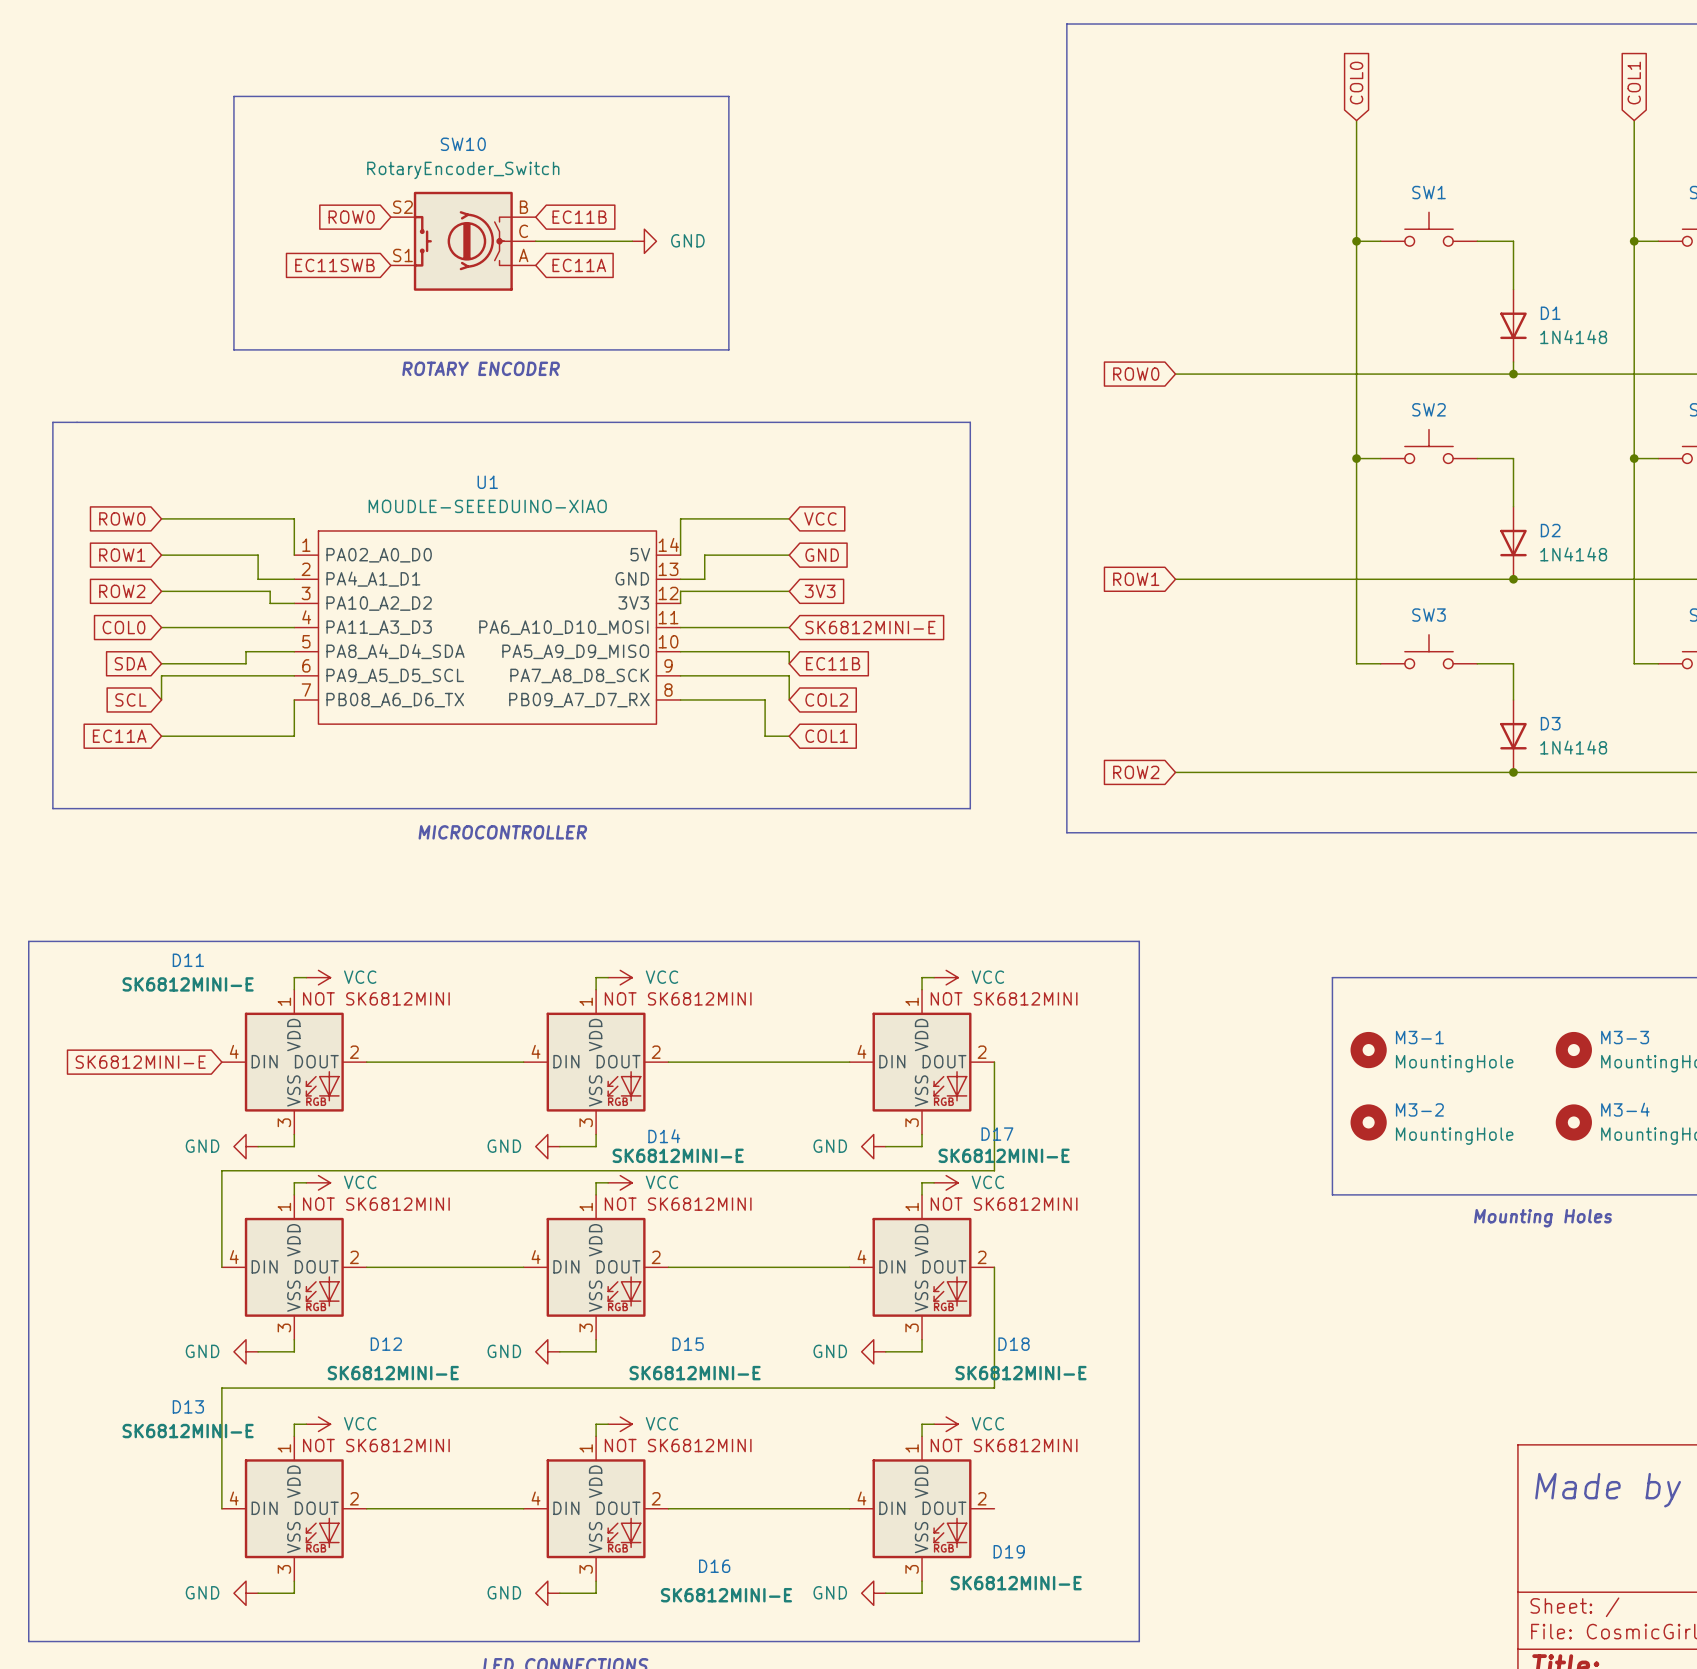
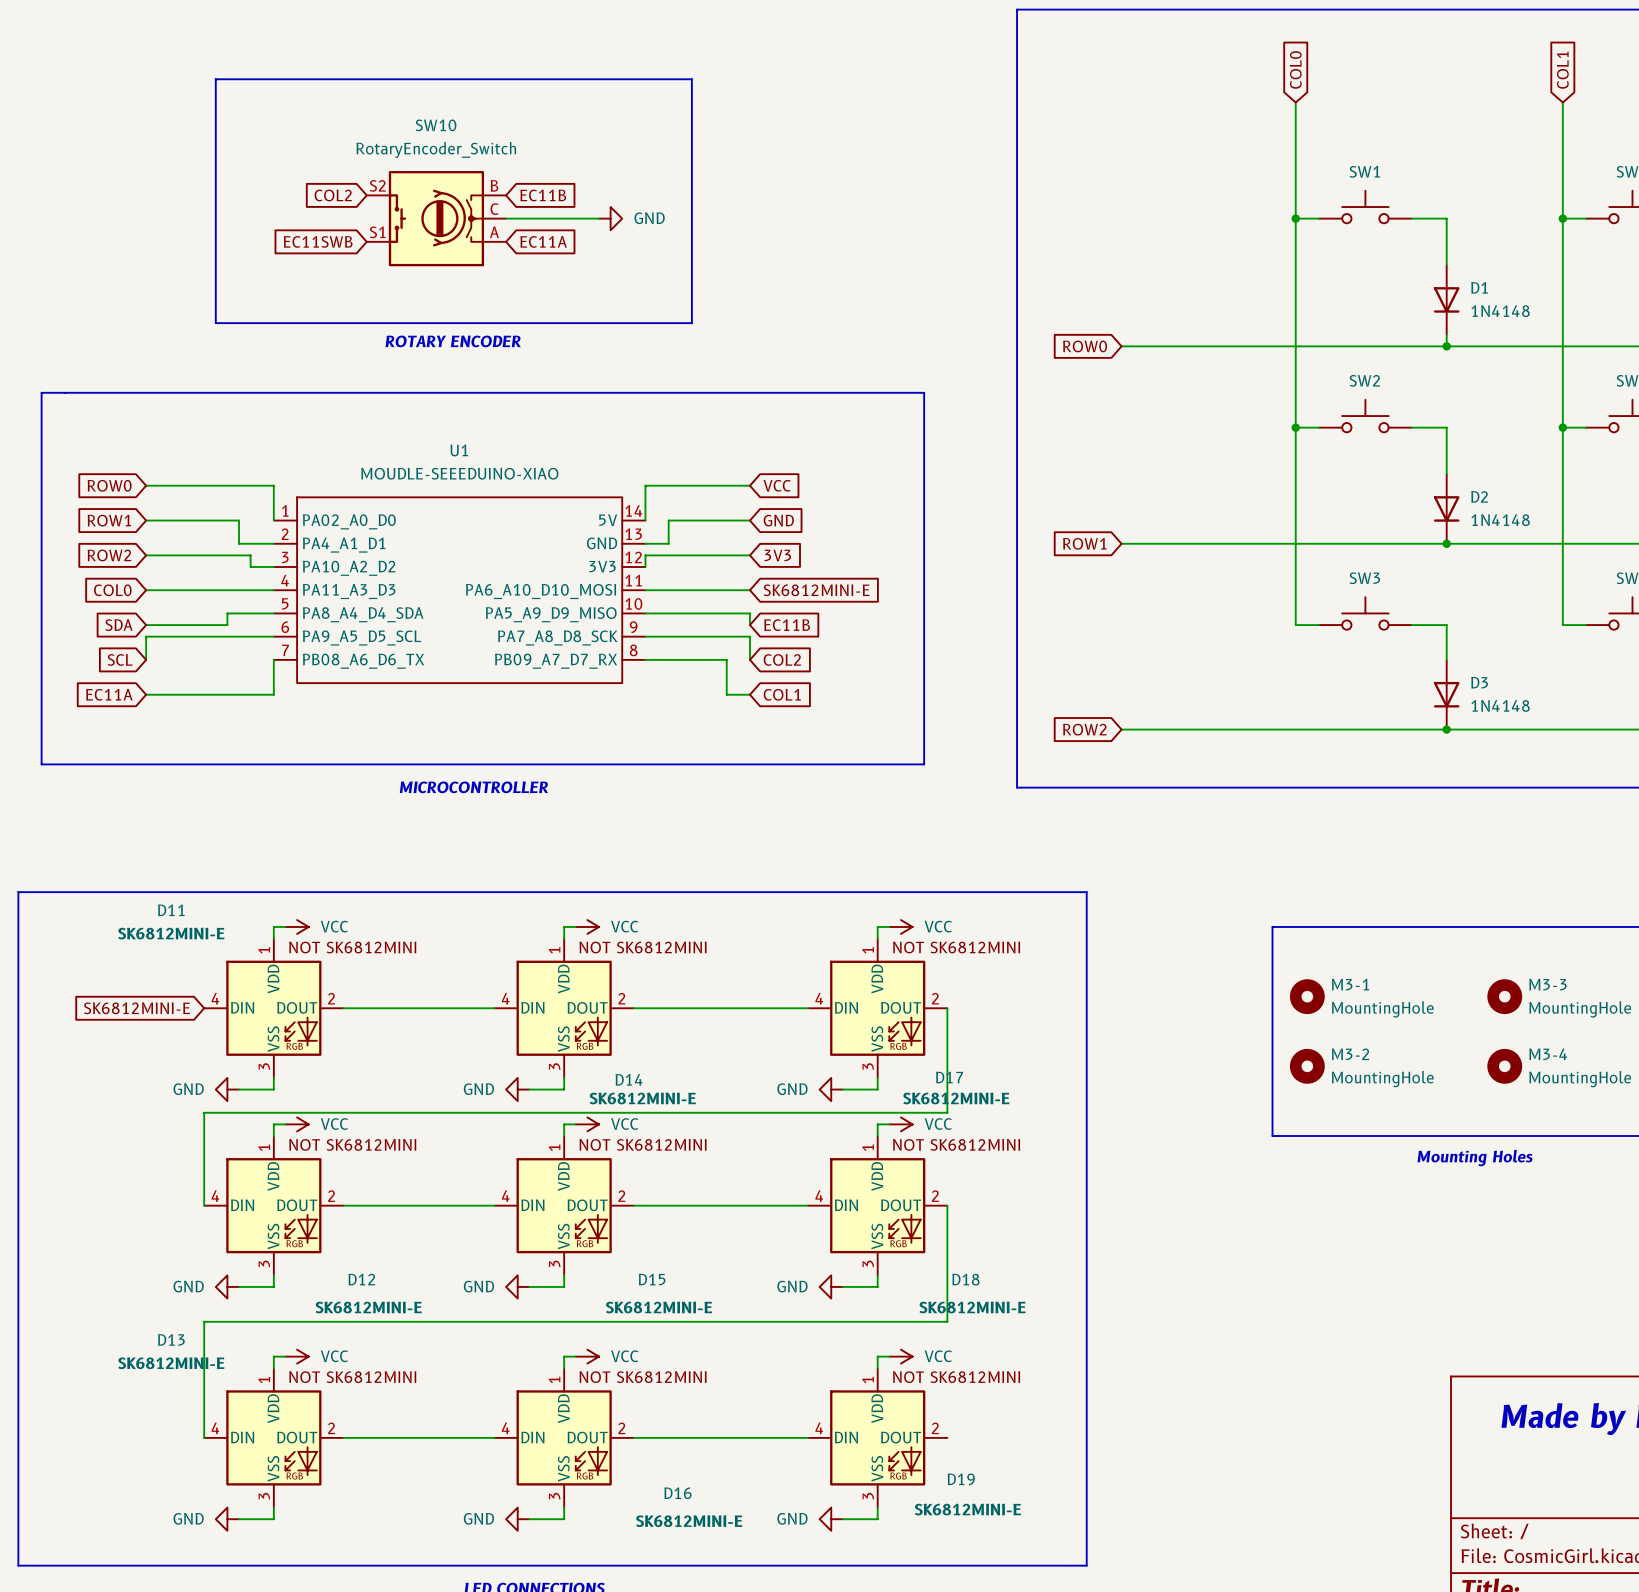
global label: ROW0 (351, 217) -> COL2 (333, 195)

